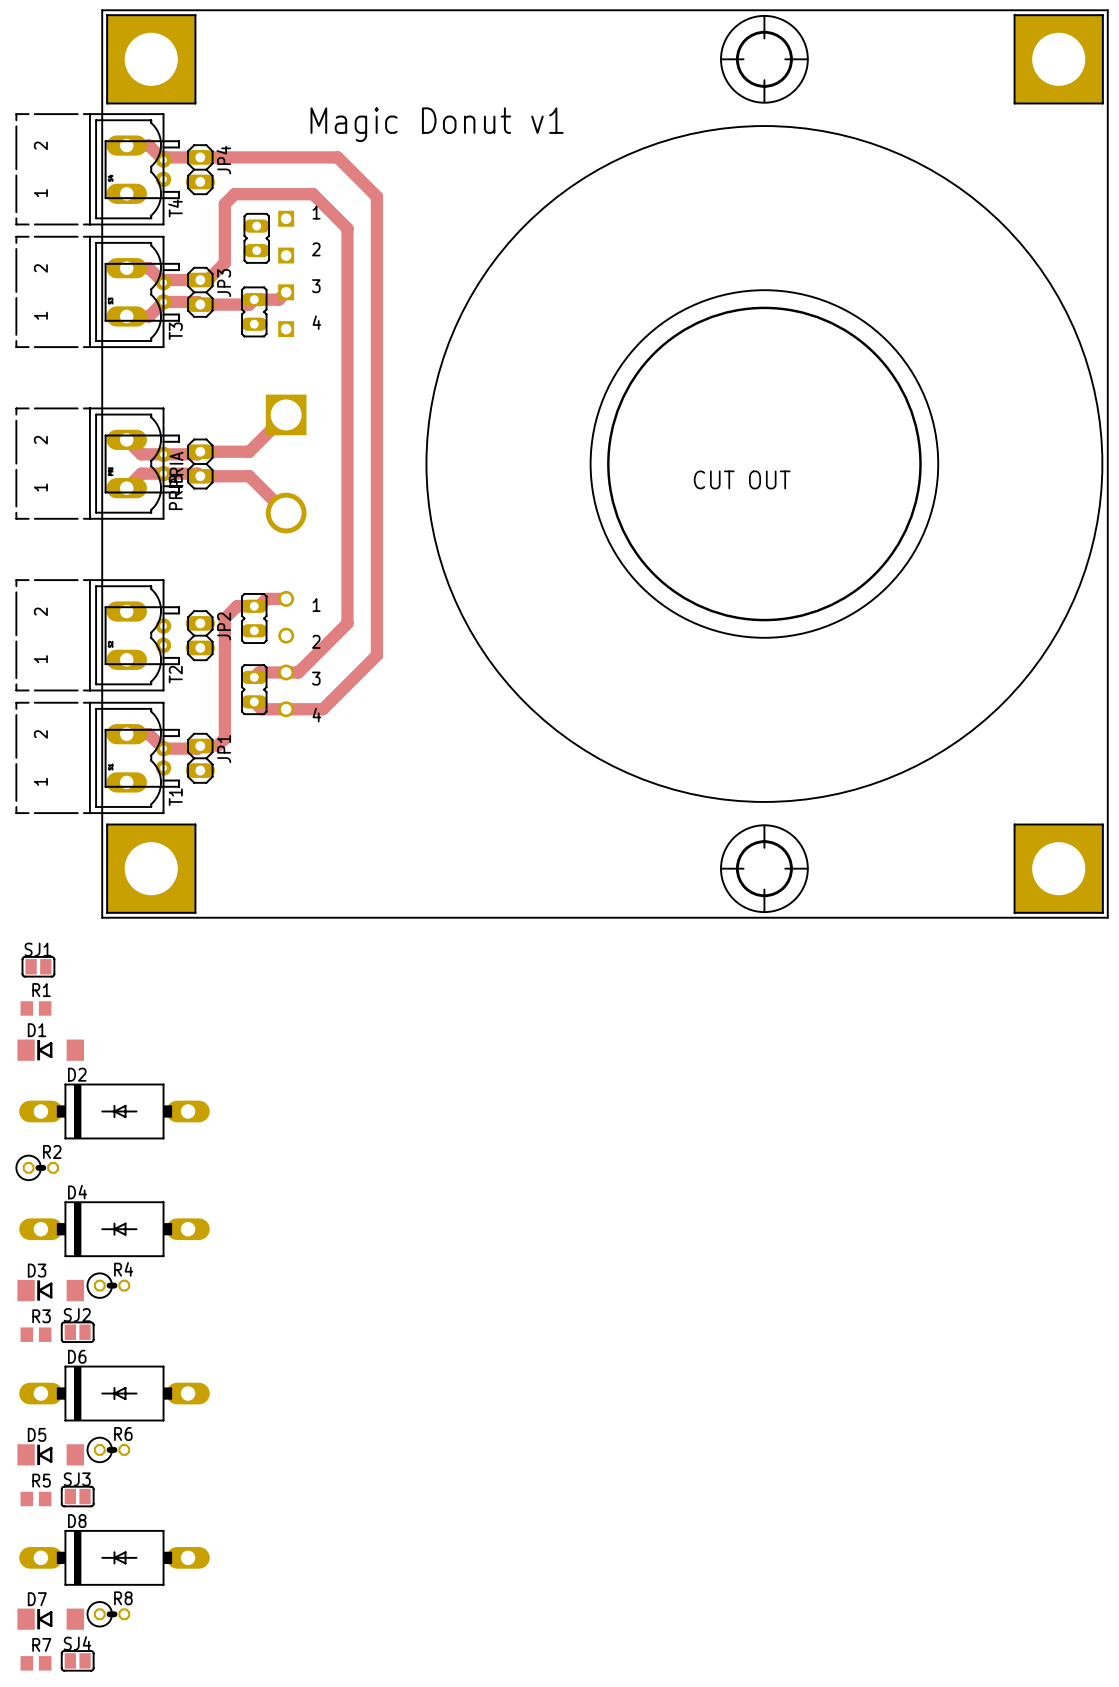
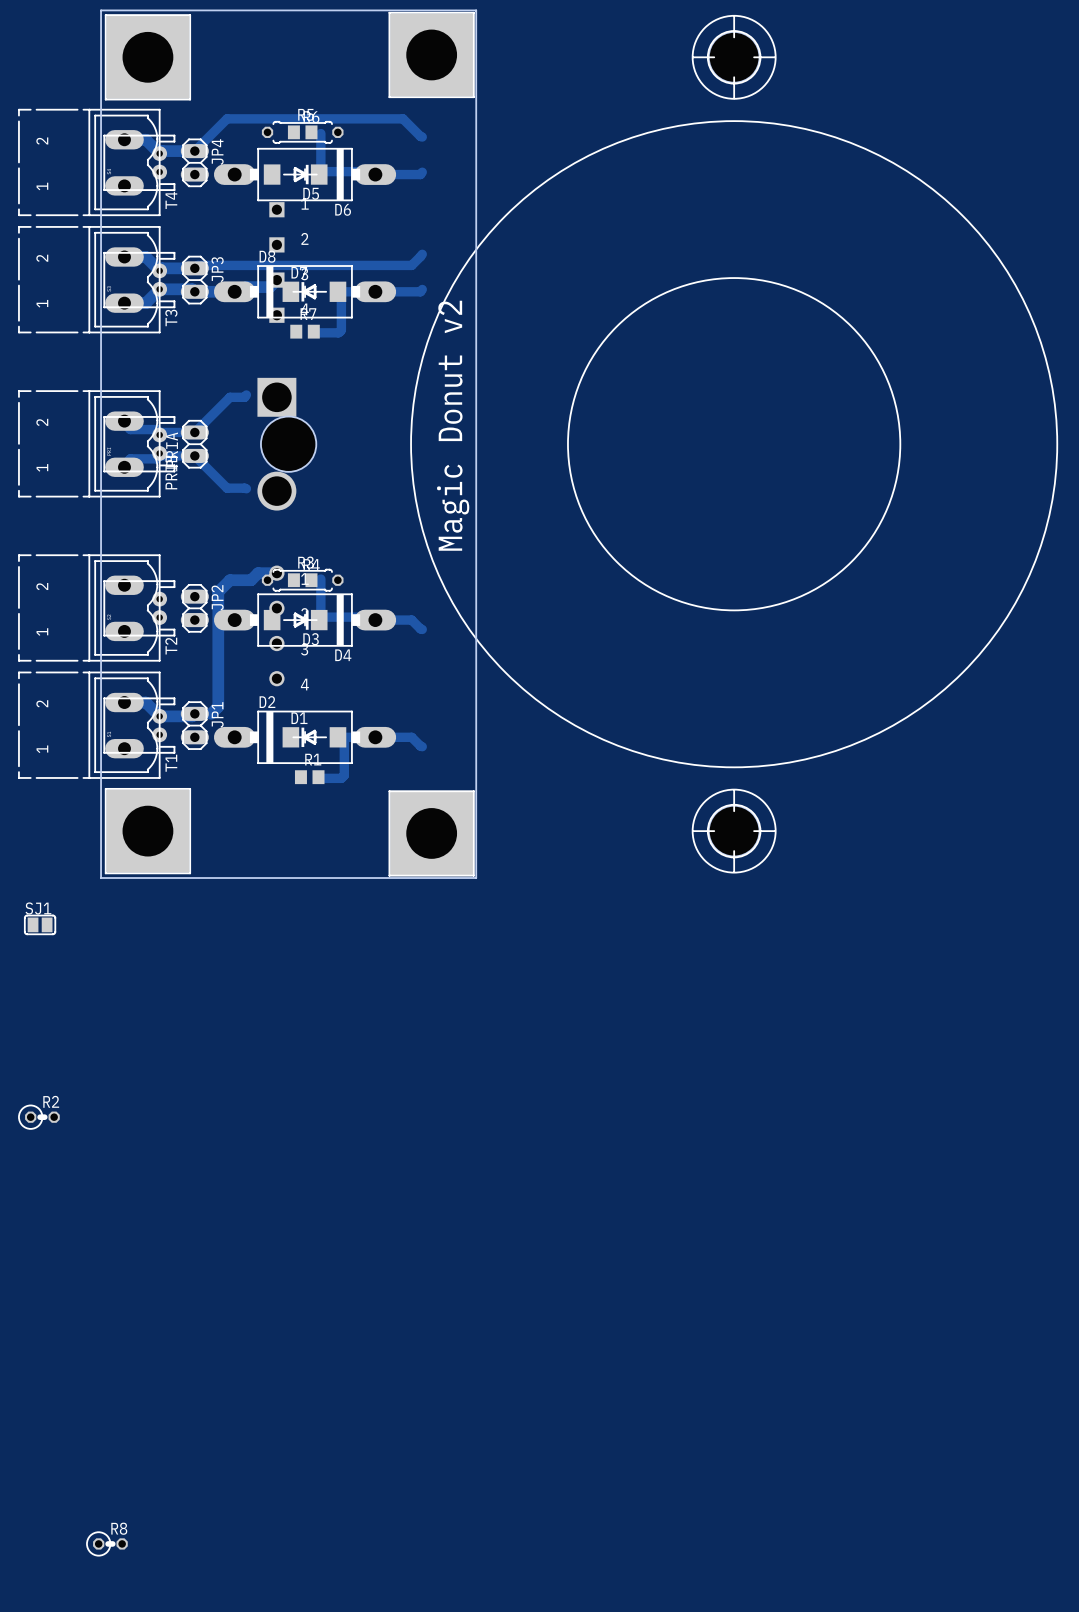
board edge: (494, 10) (1107, 10) (1107, 917) (494, 917) -> (476, 10) (476, 878)
part: none -> (431, 54)
part: (1058, 59) -> none
text: Magic Donut v1 (437, 124) -> none
track: none -> (320, 133) (320, 174) (319, 174) (323, 171) (373, 171) (375, 174) (420, 174) (422, 172)
track: (200, 157) (337, 157) (376, 196) (376, 655) (322, 709) (261, 709) (254, 701) -> (194, 151) (227, 118) (402, 118) (422, 137)
part: (256, 238) -> none
track: (200, 280) (207, 280) (224, 262) (224, 204) (234, 194) (313, 194) (347, 228) (347, 623) (298, 672) (259, 672) (254, 677) -> (194, 268) (197, 265) (411, 265) (422, 254)
track: none -> (422, 289) (420, 291) (337, 291) (341, 294) (341, 329) (338, 332) (313, 331)
round board edge: [607, 306, 922, 622] -> none
part: (254, 311) -> none
track: (286, 414) (249, 451) (141, 454) (126, 439) -> (246, 394) (244, 397) (230, 397) (194, 432) (159, 432) (159, 434) (156, 429) (130, 429) (124, 421)
text: none -> Magic Donut v2 (453, 425)
hole: none -> (288, 444)
text: CUT OUT (742, 479) -> none
track: (126, 488) (141, 473) (249, 476) (286, 513) -> (124, 467) (130, 458) (156, 458) (159, 453) (159, 455) (194, 455) (227, 488) (246, 488)
track: none -> (320, 579) (320, 620) (319, 620) (323, 617) (373, 617) (375, 620) (411, 620) (422, 629)
part: (254, 618) -> none
part: (254, 689) -> none
track: none -> (422, 746) (411, 737) (337, 737) (344, 740) (344, 775) (341, 778) (318, 777)
part: (1058, 868) -> none
part: none -> (431, 833)
R1 position: (35, 1008) -> (309, 777)
D1 position: (50, 1050) -> (314, 737)
D2 position: (114, 1111) -> (305, 737)
D4 rotation: 0° (114, 1229) -> 180° (305, 620)
D4 position: (114, 1229) -> (305, 620)
R4 footprint: [86, 1272, 131, 1299] -> [261, 568, 344, 592]
D3 rotation: 0° (50, 1290) -> 180° (295, 620)
D3 position: (50, 1290) -> (295, 620)
SJ2: (77, 1332) -> none
R3 position: (35, 1334) -> (302, 580)
D6 rotation: 0° (114, 1393) -> 180° (305, 174)
D6 position: (114, 1393) -> (305, 174)
R6 footprint: [86, 1436, 131, 1463] -> [261, 121, 344, 144]
D5 rotation: 0° (50, 1454) -> 180° (295, 174)
D5 position: (50, 1454) -> (295, 174)
SJ3: (77, 1496) -> none
R5 position: (35, 1499) -> (302, 132)
D8 position: (114, 1557) -> (305, 291)
D7 position: (50, 1619) -> (314, 291)
SJ4: (77, 1660) -> none
R7 position: (35, 1663) -> (305, 331)

